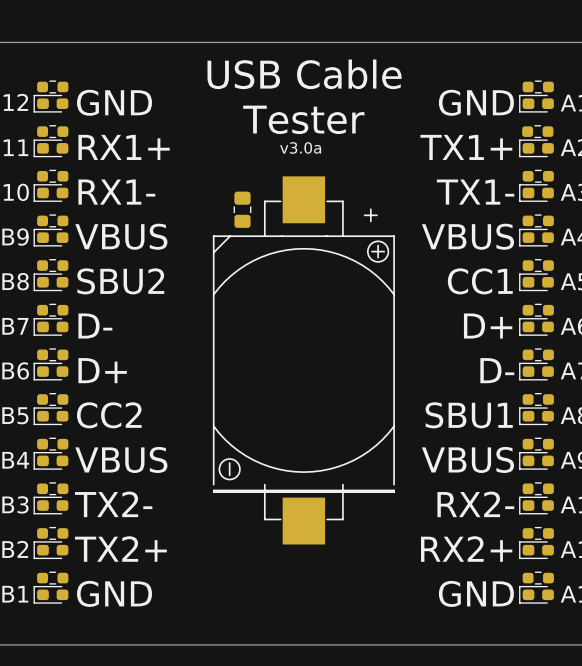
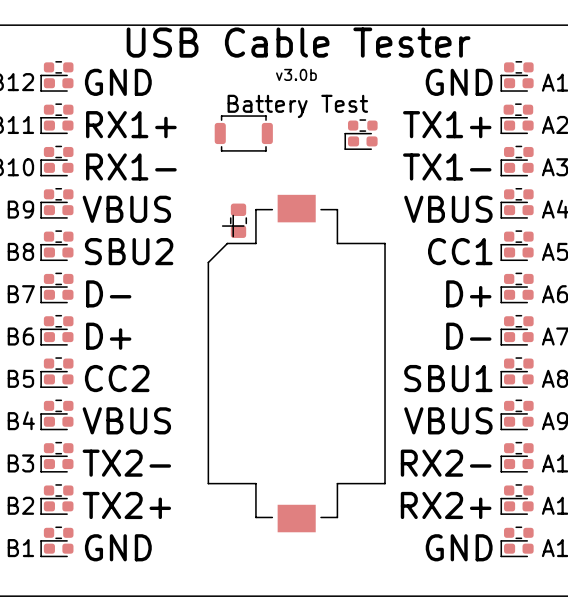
text: USB Cable (304, 74) -> USB Cable Tester (298, 42)
text: none -> v3.0b (296, 74)
text: Tester (303, 119) -> Battery Test (297, 106)
text: v3.0a (300, 147) -> none
part: none -> (362, 125)
part: none -> (243, 133)
part: none -> (361, 141)
part position: (242, 209) -> (238, 220)
part: (303, 360) -> none
part: none -> (296, 363)

